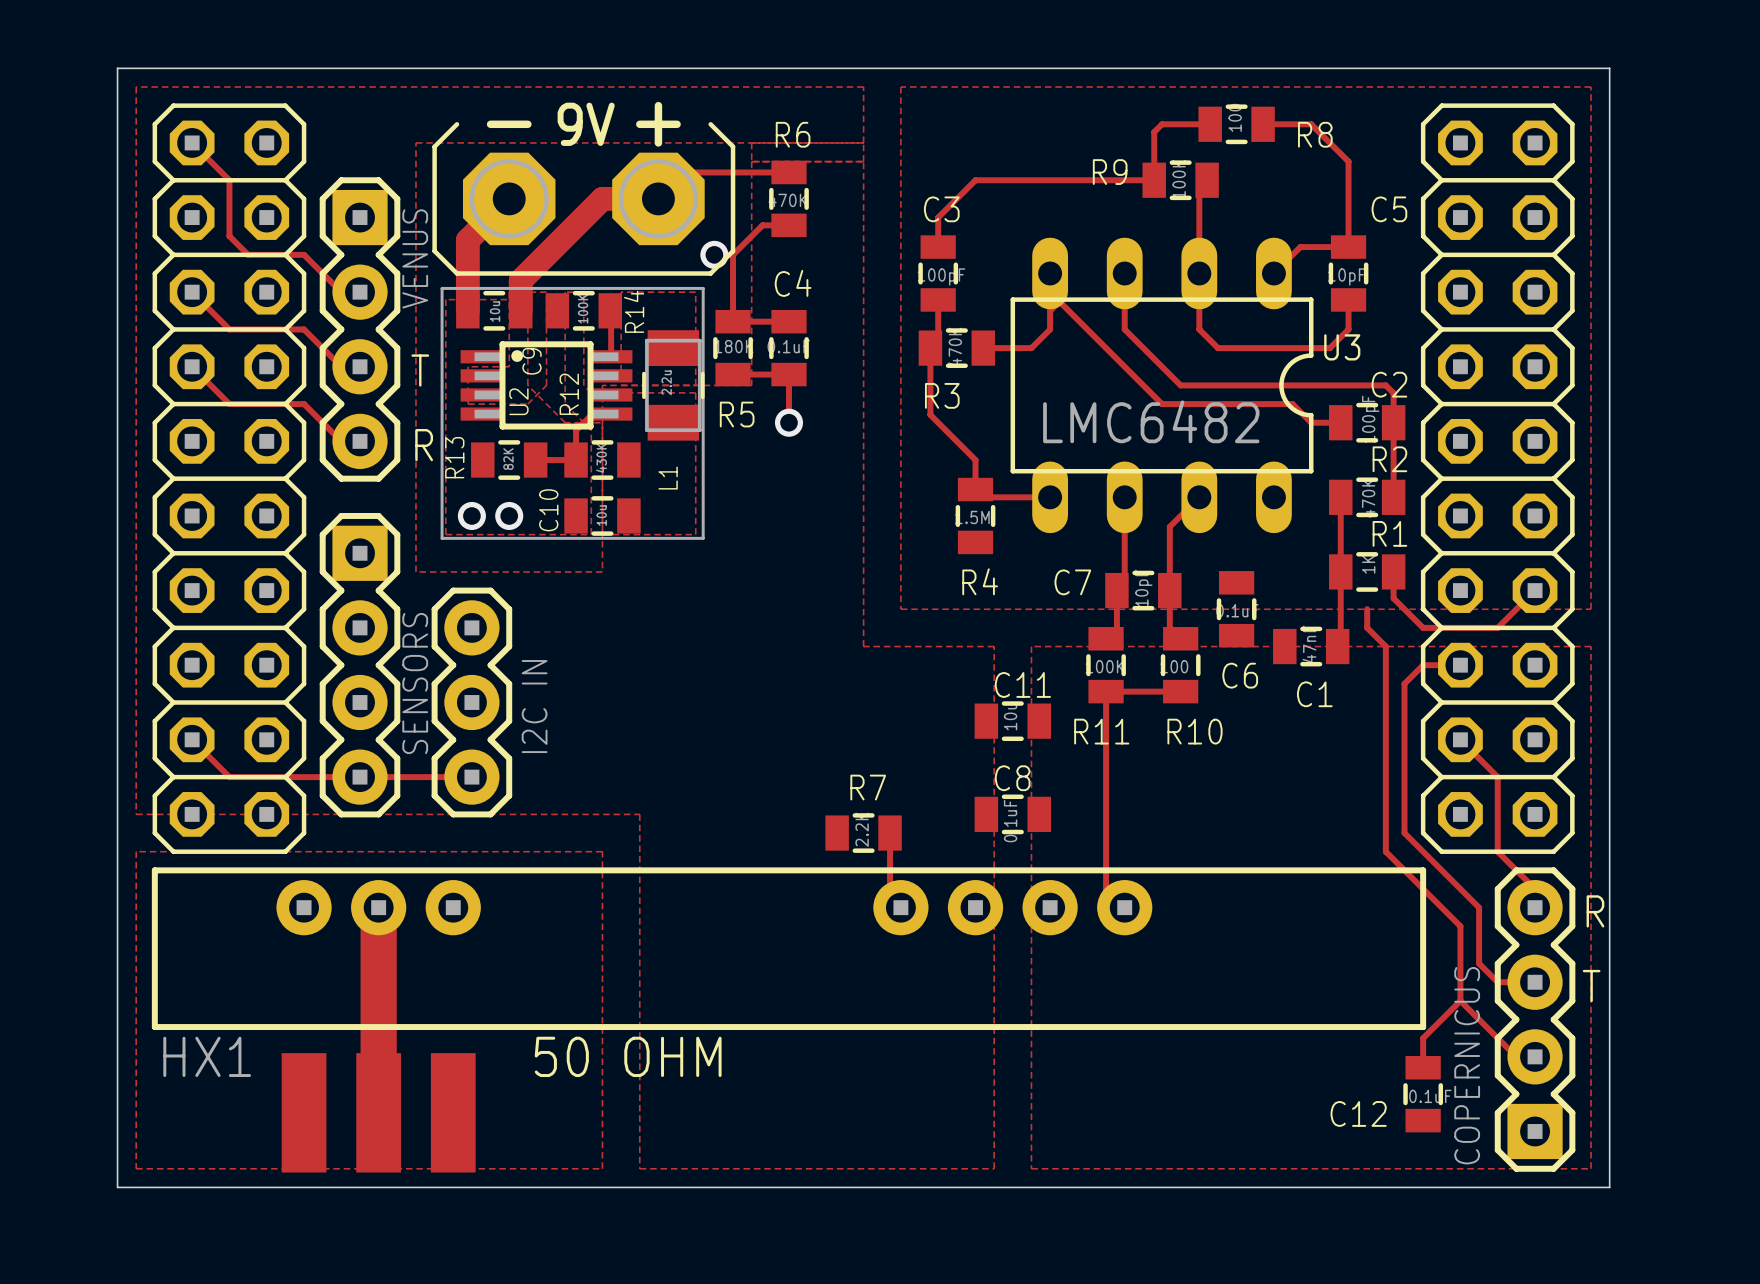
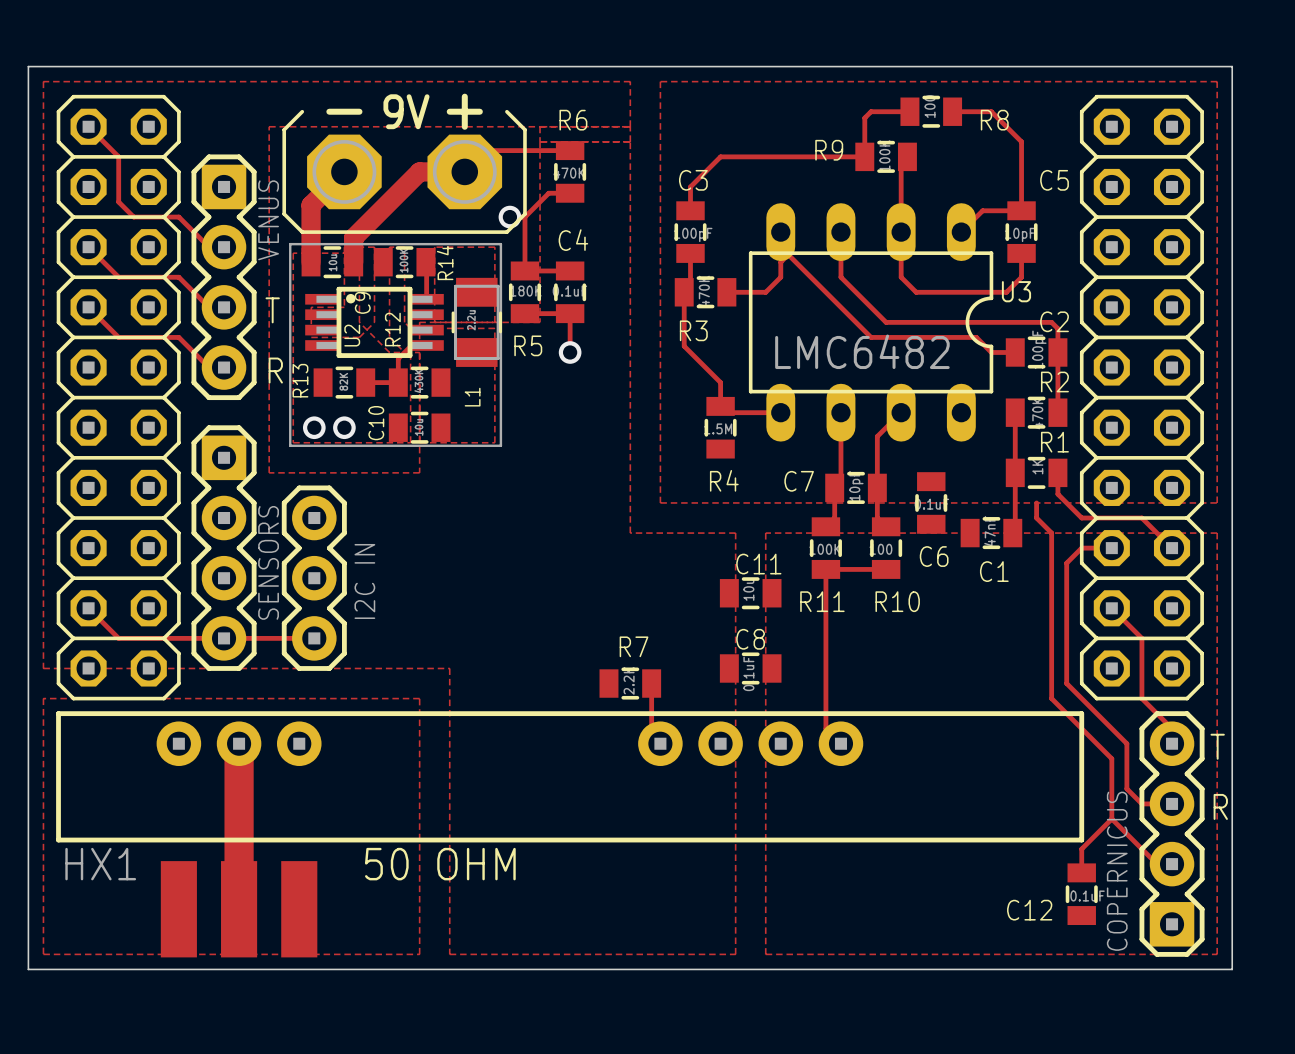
track: (1535, 590) (1497, 627) -> (1172, 548) (1141, 518)
text: R (1595, 911) -> T (1217, 746)
text: T (1591, 986) -> R (1220, 806)

